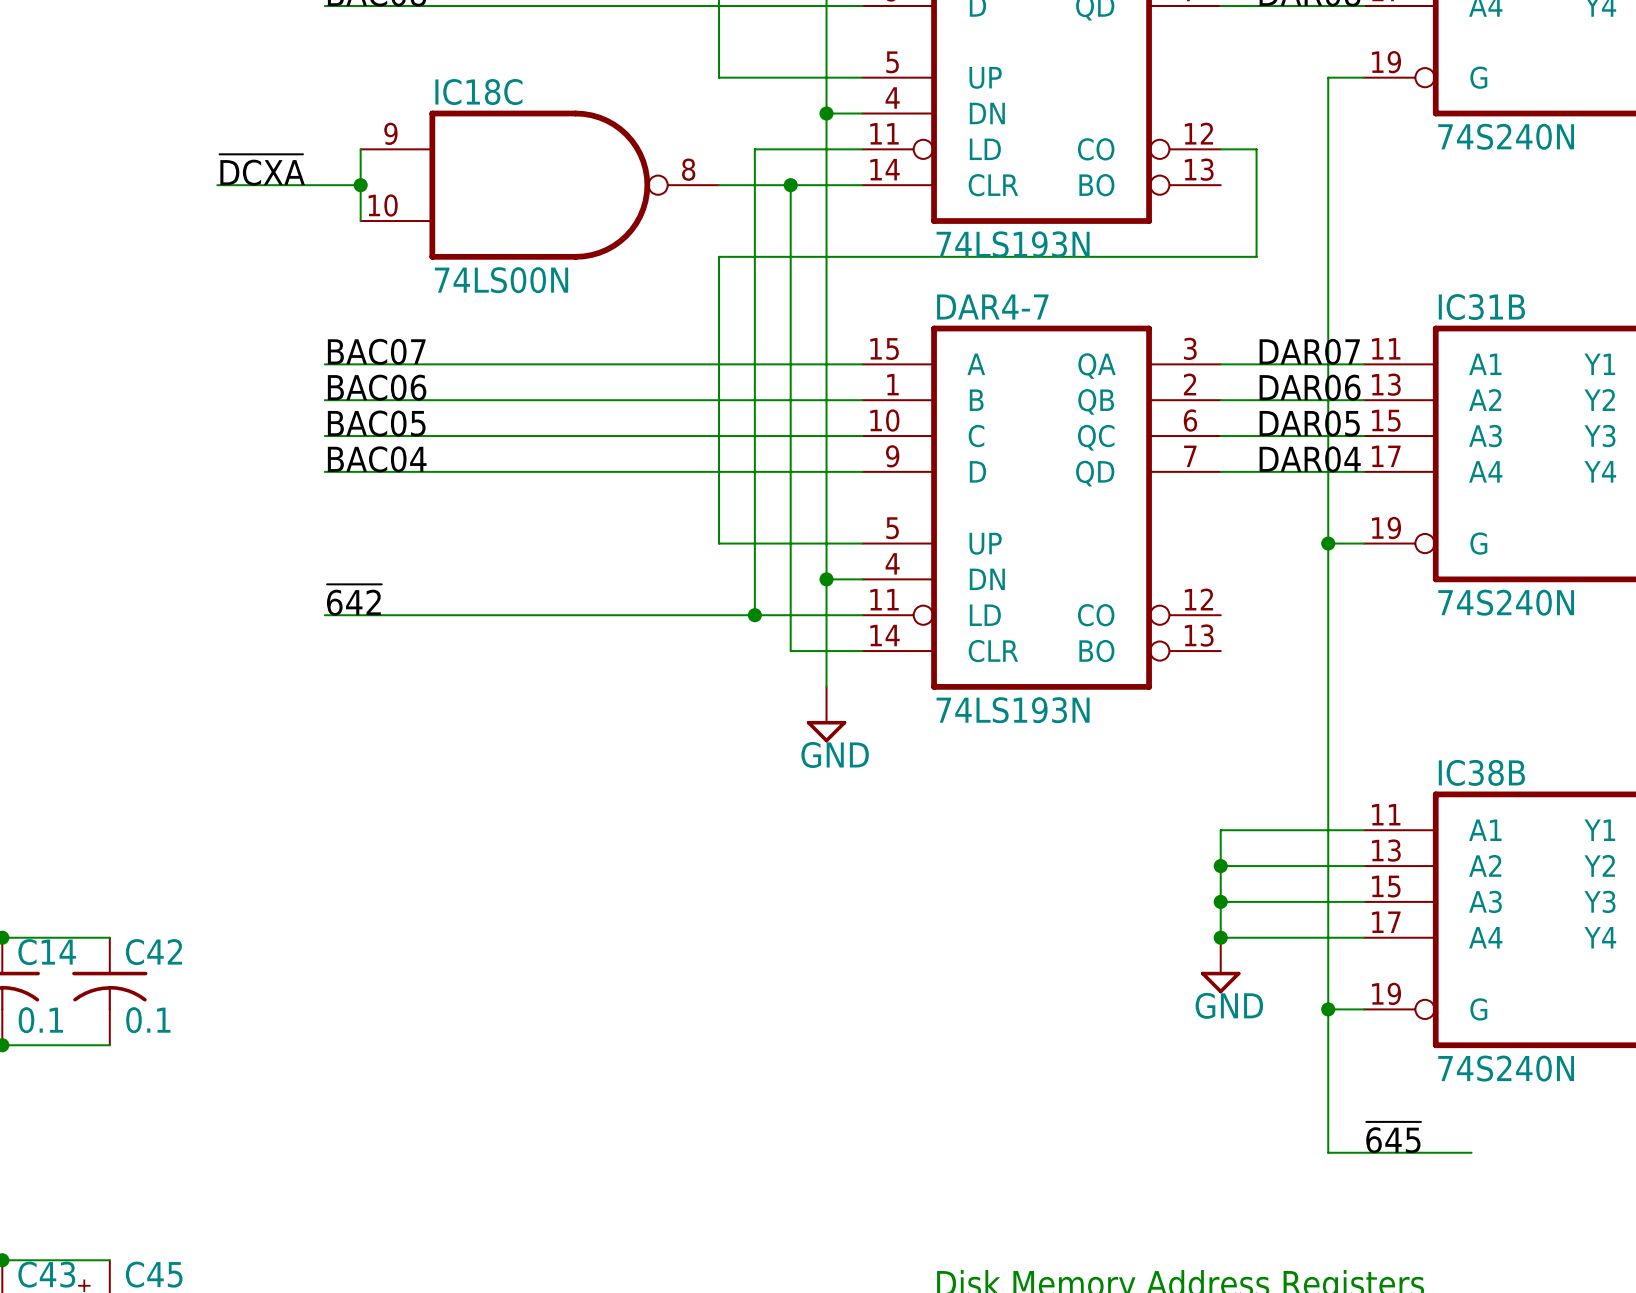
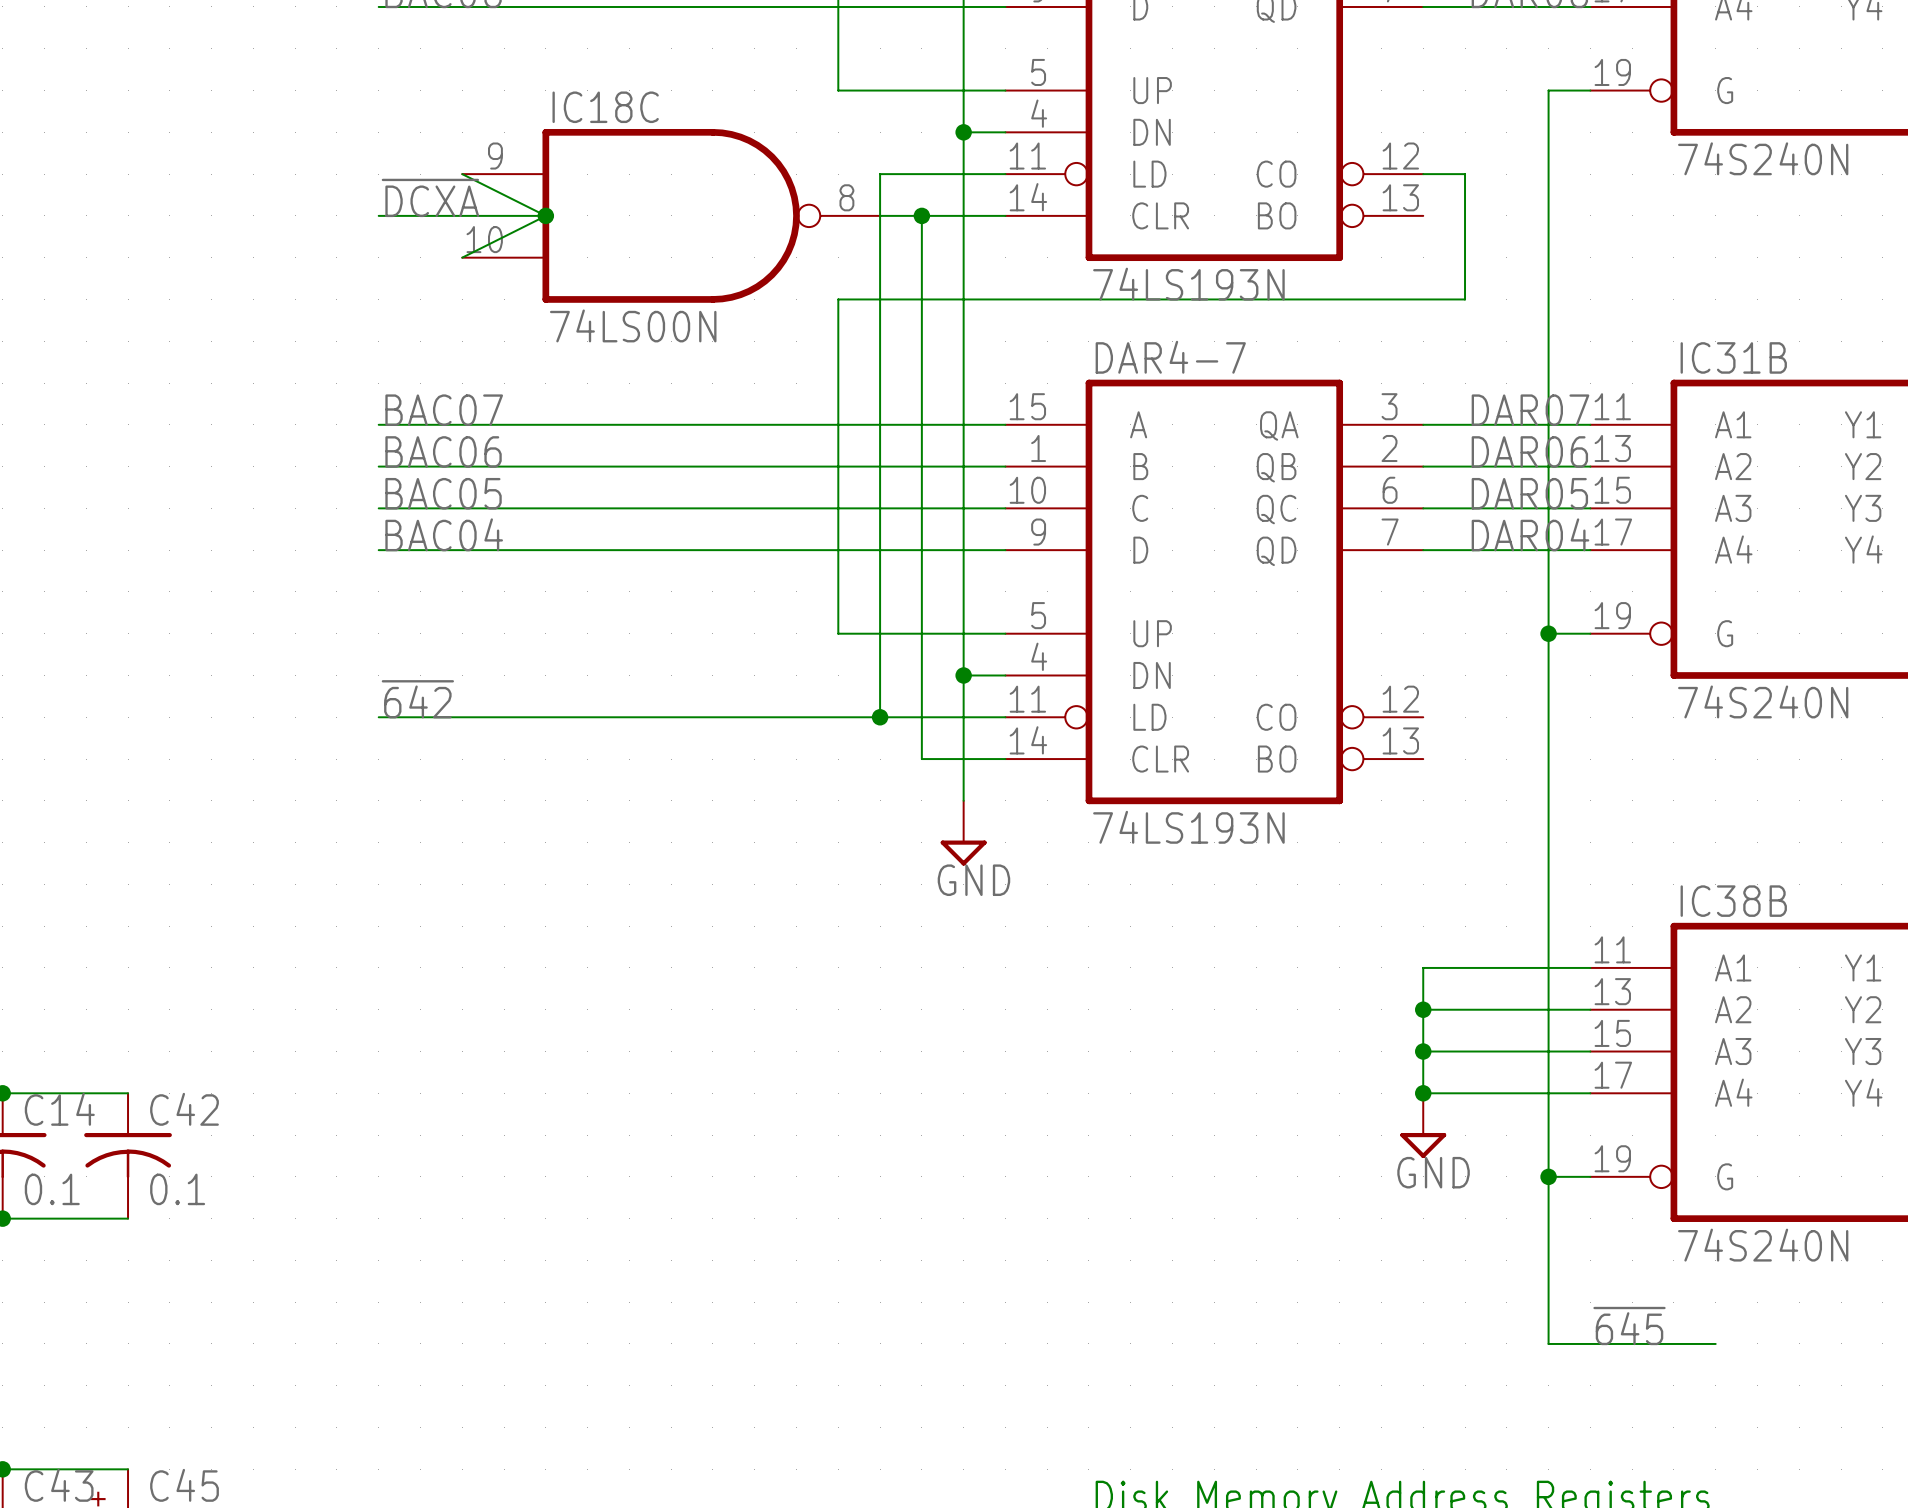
wire: (360, 149) (360, 221) -> none
wire: none -> (462, 174) (545, 215)
label position: ~{DCXA} (262, 169) -> ~{DCXA} (430, 197)
wire: (217, 185) (324, 185) -> (420, 215) (545, 215)
junction: (360, 185) -> none
wire: none -> (545, 215) (462, 257)
junction: none -> (545, 215)
IC18C position: (539, 185) -> (671, 215)

